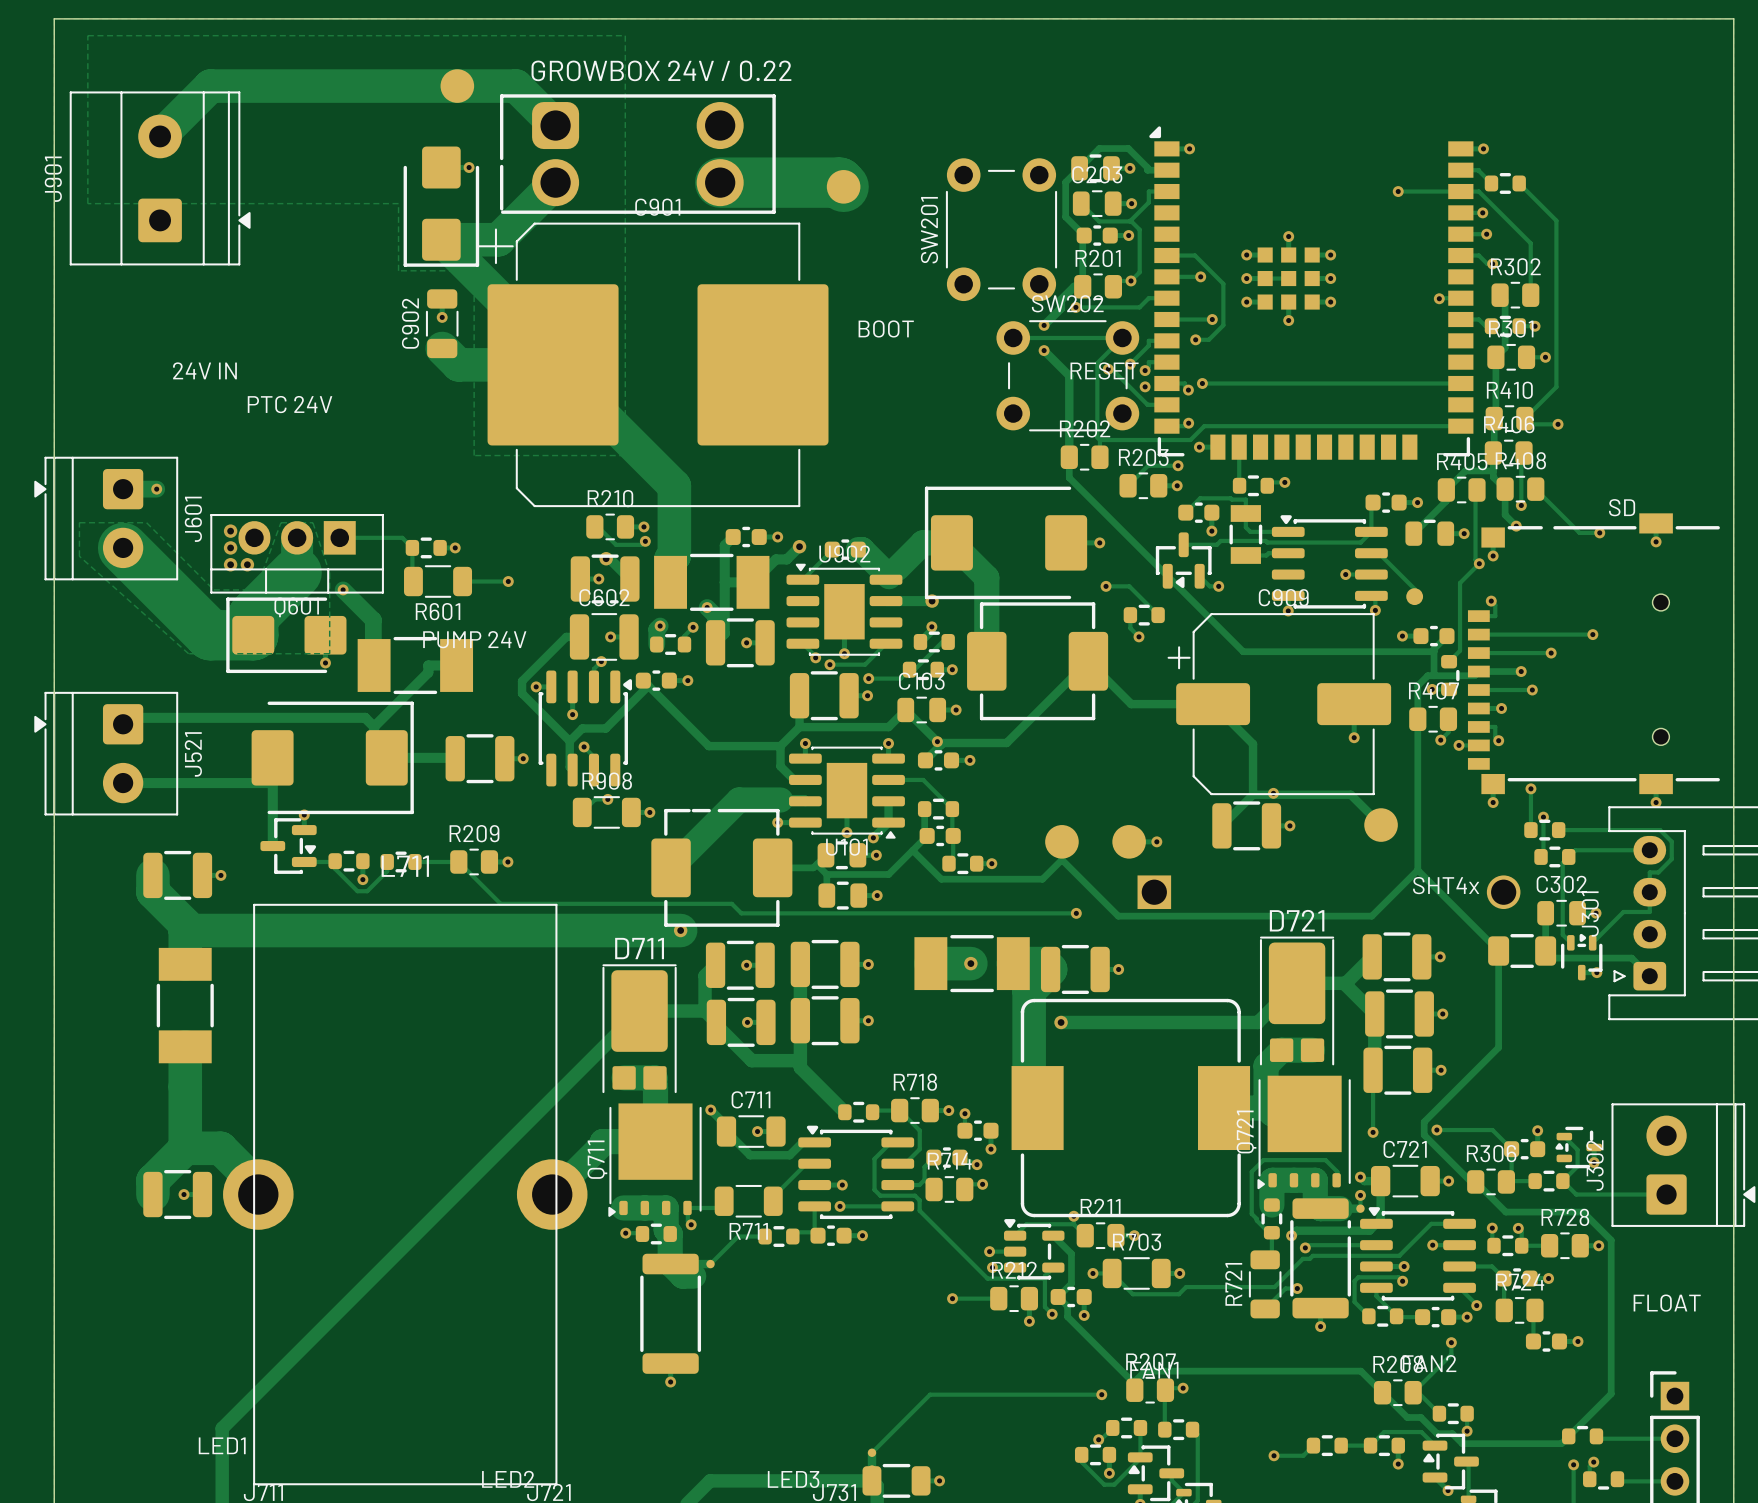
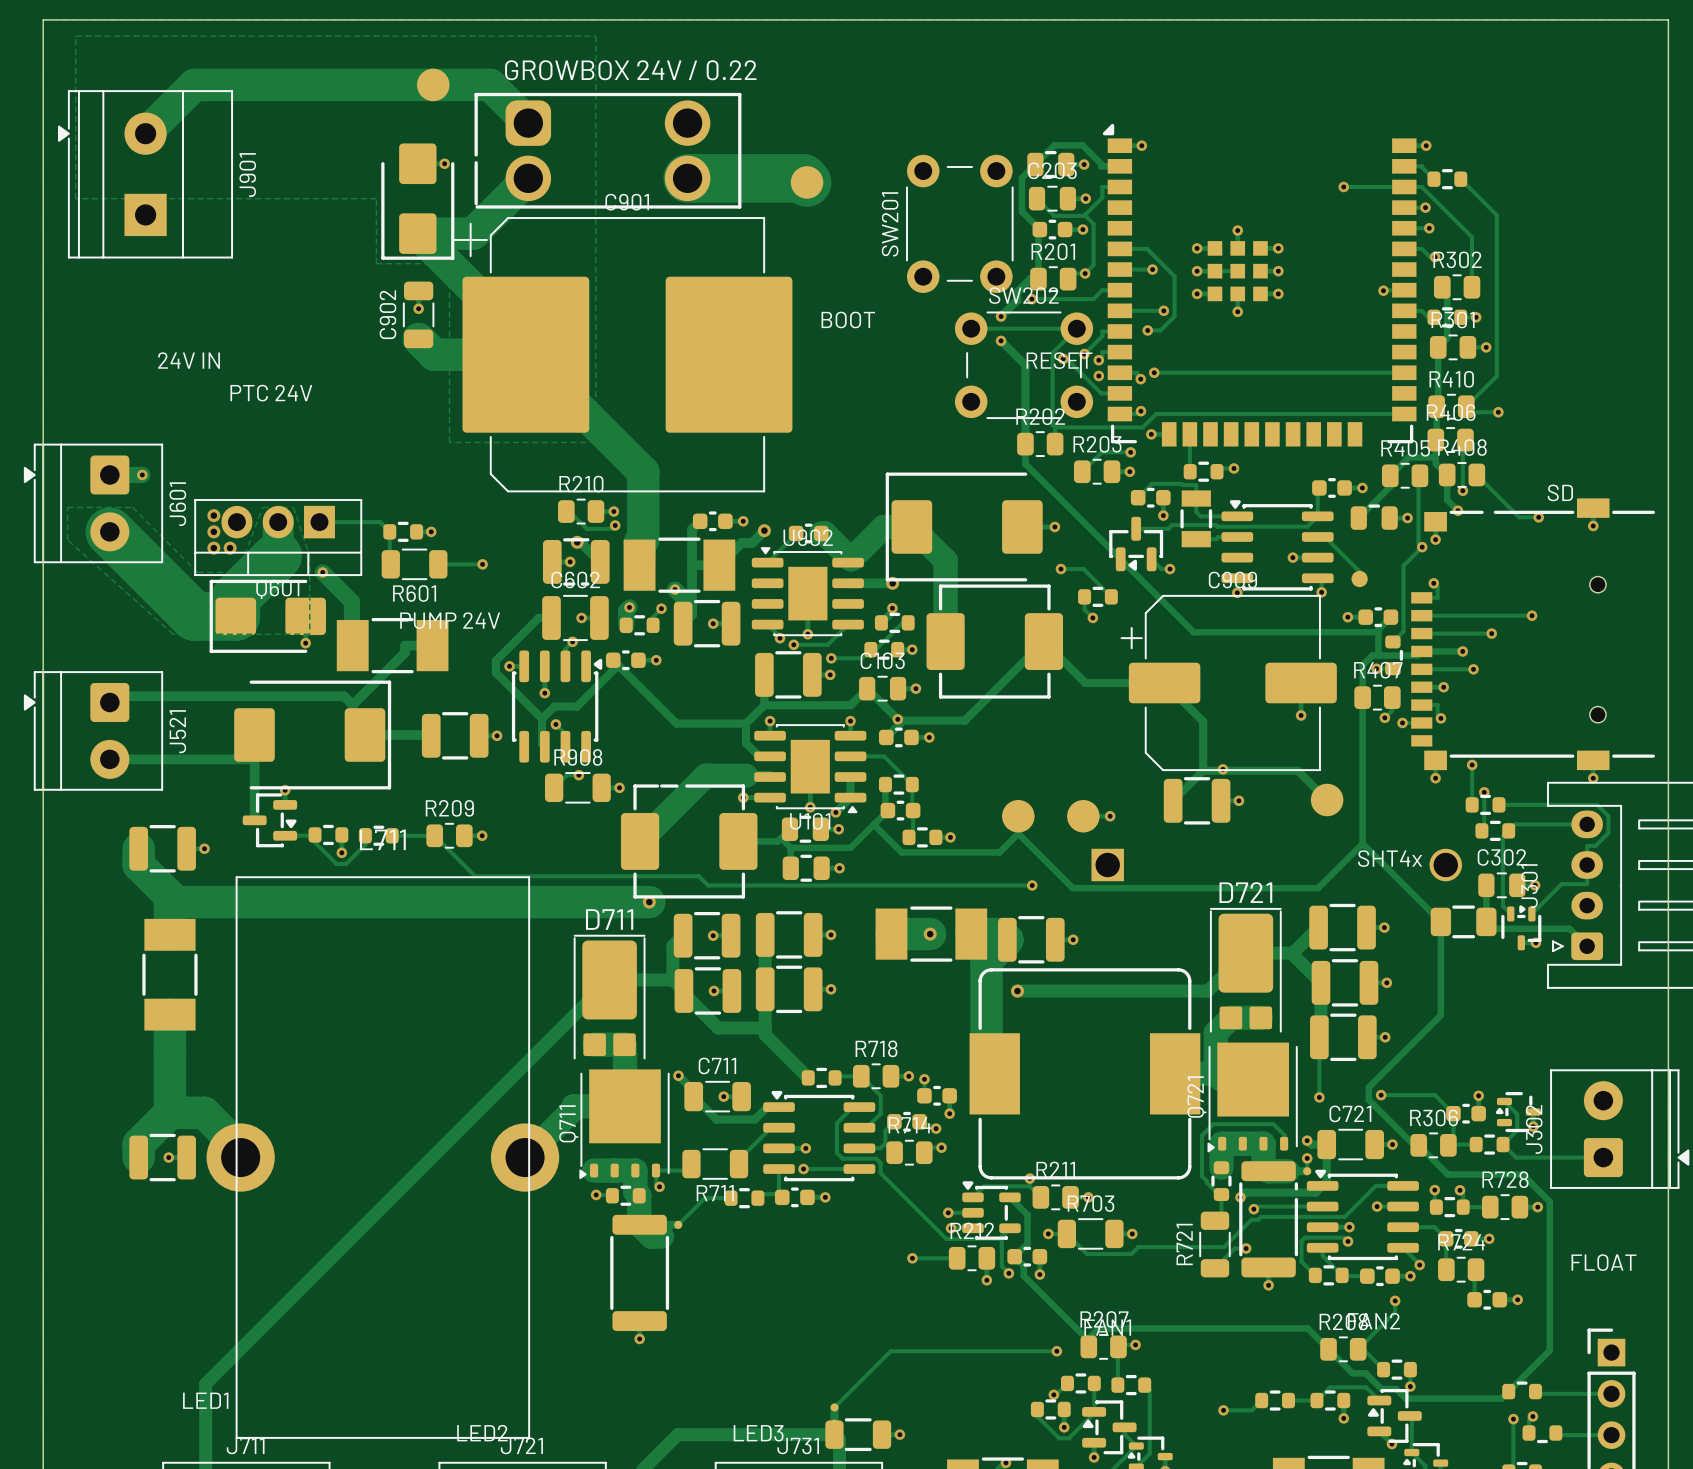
J901 footprint: [69, 91, 251, 266] -> [57, 90, 234, 259]
J901 name position: J901 (53, 179) -> J901 (247, 175)

